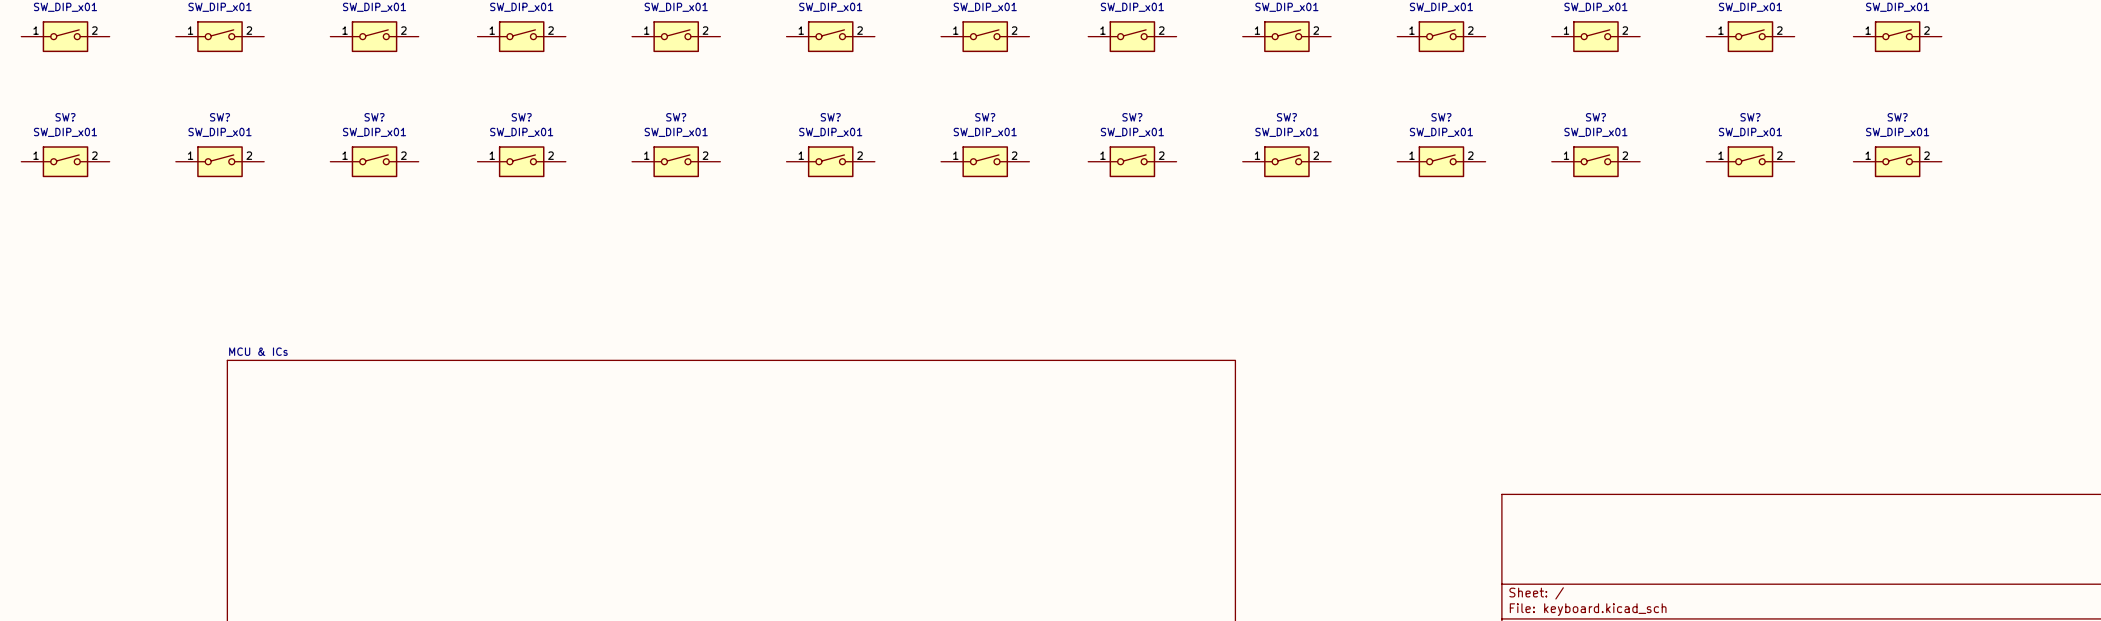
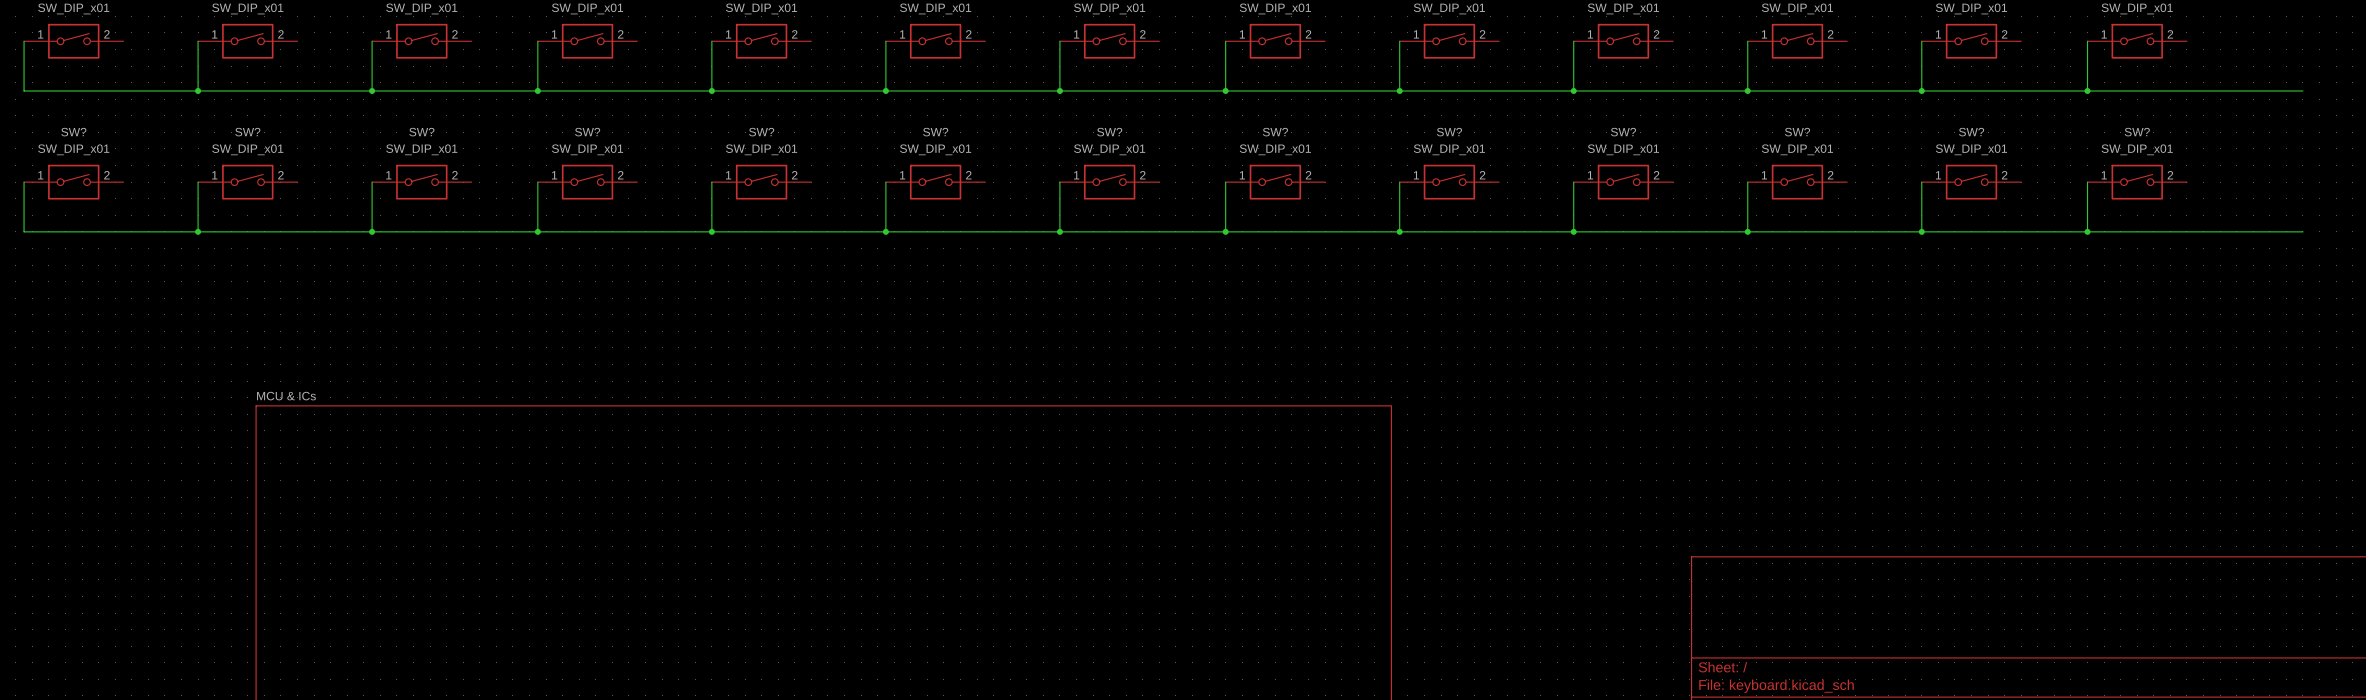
wire: none -> (24, 41) (24, 90) (2302, 90)
wire: none -> (198, 41) (198, 90)
wire: none -> (372, 41) (372, 90)
wire: none -> (537, 41) (537, 90)
wire: none -> (711, 41) (711, 90)
wire: none -> (885, 41) (885, 90)
wire: none -> (1059, 41) (1059, 90)
wire: none -> (1225, 41) (1225, 90)
wire: none -> (1399, 41) (1399, 90)
wire: none -> (1573, 41) (1573, 90)
wire: none -> (1747, 41) (1747, 90)
wire: none -> (1921, 41) (1921, 90)
wire: none -> (2087, 41) (2087, 90)
junction: none -> (198, 90)
junction: none -> (372, 90)
junction: none -> (537, 90)
junction: none -> (711, 90)
junction: none -> (885, 90)
junction: none -> (1059, 90)
junction: none -> (1225, 90)
junction: none -> (1399, 90)
junction: none -> (1573, 90)
junction: none -> (1747, 90)
junction: none -> (1921, 90)
junction: none -> (2087, 90)
wire: none -> (24, 182) (24, 231) (2302, 231)
wire: none -> (198, 182) (198, 231)
wire: none -> (372, 182) (372, 231)
wire: none -> (537, 182) (537, 231)
wire: none -> (711, 182) (711, 231)
wire: none -> (885, 182) (885, 231)
wire: none -> (1059, 182) (1059, 231)
wire: none -> (1225, 182) (1225, 231)
wire: none -> (1399, 182) (1399, 231)
wire: none -> (1573, 182) (1573, 231)
wire: none -> (1747, 182) (1747, 231)
wire: none -> (1921, 182) (1921, 231)
wire: none -> (2087, 182) (2087, 231)
junction: none -> (198, 231)
junction: none -> (372, 231)
junction: none -> (537, 231)
junction: none -> (711, 231)
junction: none -> (885, 231)
junction: none -> (1059, 231)
junction: none -> (1225, 231)
junction: none -> (1399, 231)
junction: none -> (1573, 231)
junction: none -> (1747, 231)
junction: none -> (1921, 231)
junction: none -> (2087, 231)

